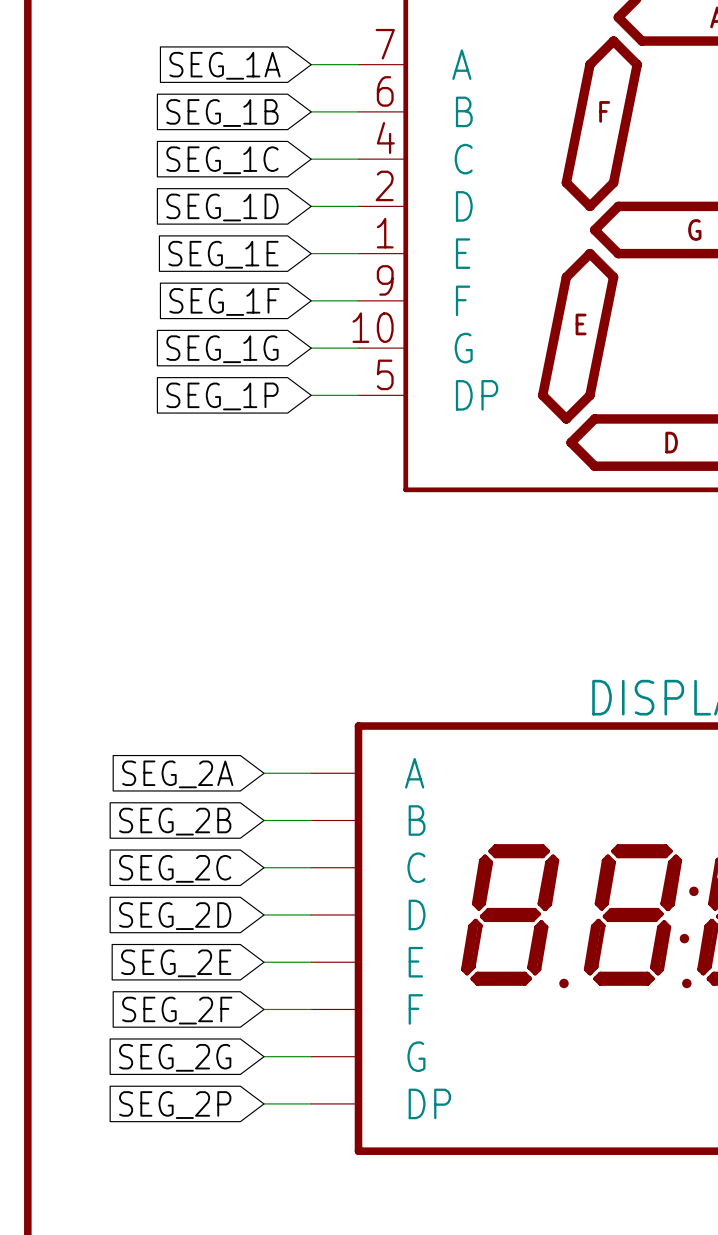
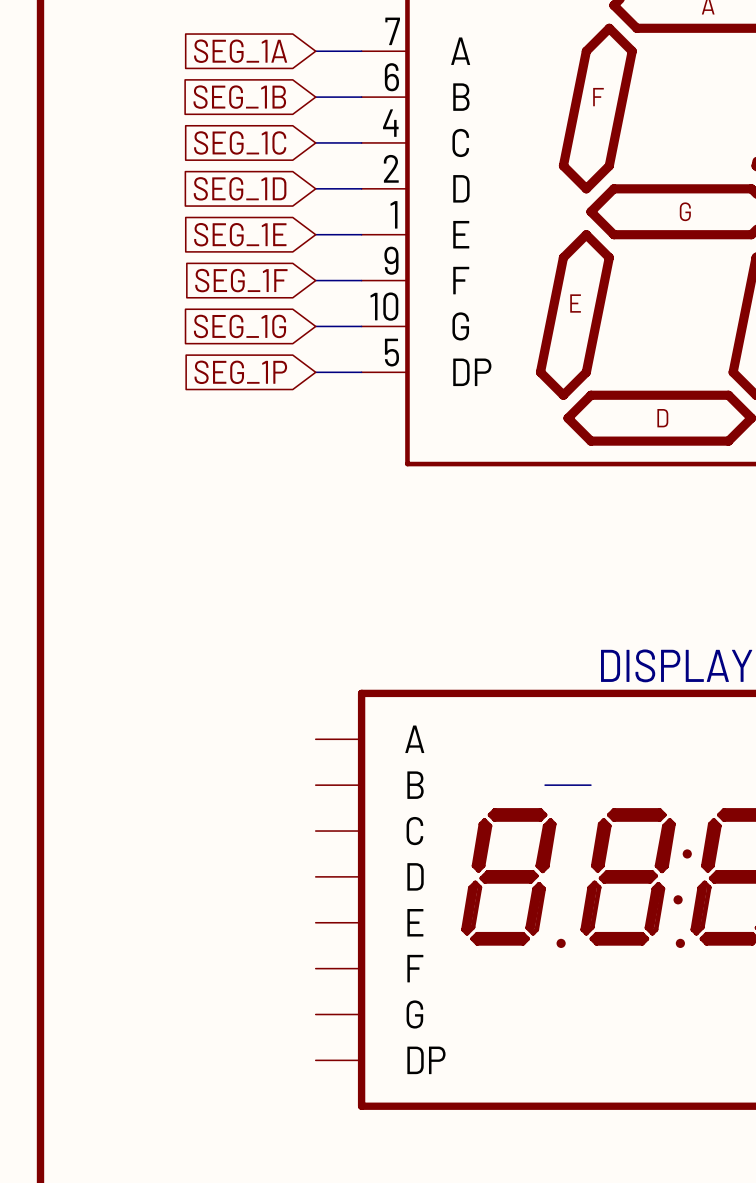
wire: (264, 773) (311, 773) -> none
global label: SEG_2A (177, 774) -> none
wire: (264, 820) (311, 820) -> (545, 785) (590, 785)
global label: SEG_2B (175, 821) -> none
wire: (264, 867) (311, 867) -> none
global label: SEG_2C (175, 868) -> none
wire: (264, 914) (311, 914) -> none
global label: SEG_2D (175, 916) -> none
wire: (264, 962) (311, 962) -> none
global label: SEG_2E (176, 963) -> none
wire: (264, 1009) (311, 1009) -> none
global label: SEG_2F (177, 1010) -> none
wire: (264, 1056) (311, 1056) -> none
global label: SEG_2G (175, 1057) -> none
wire: (264, 1103) (311, 1103) -> none
global label: SEG_2P (175, 1105) -> none

